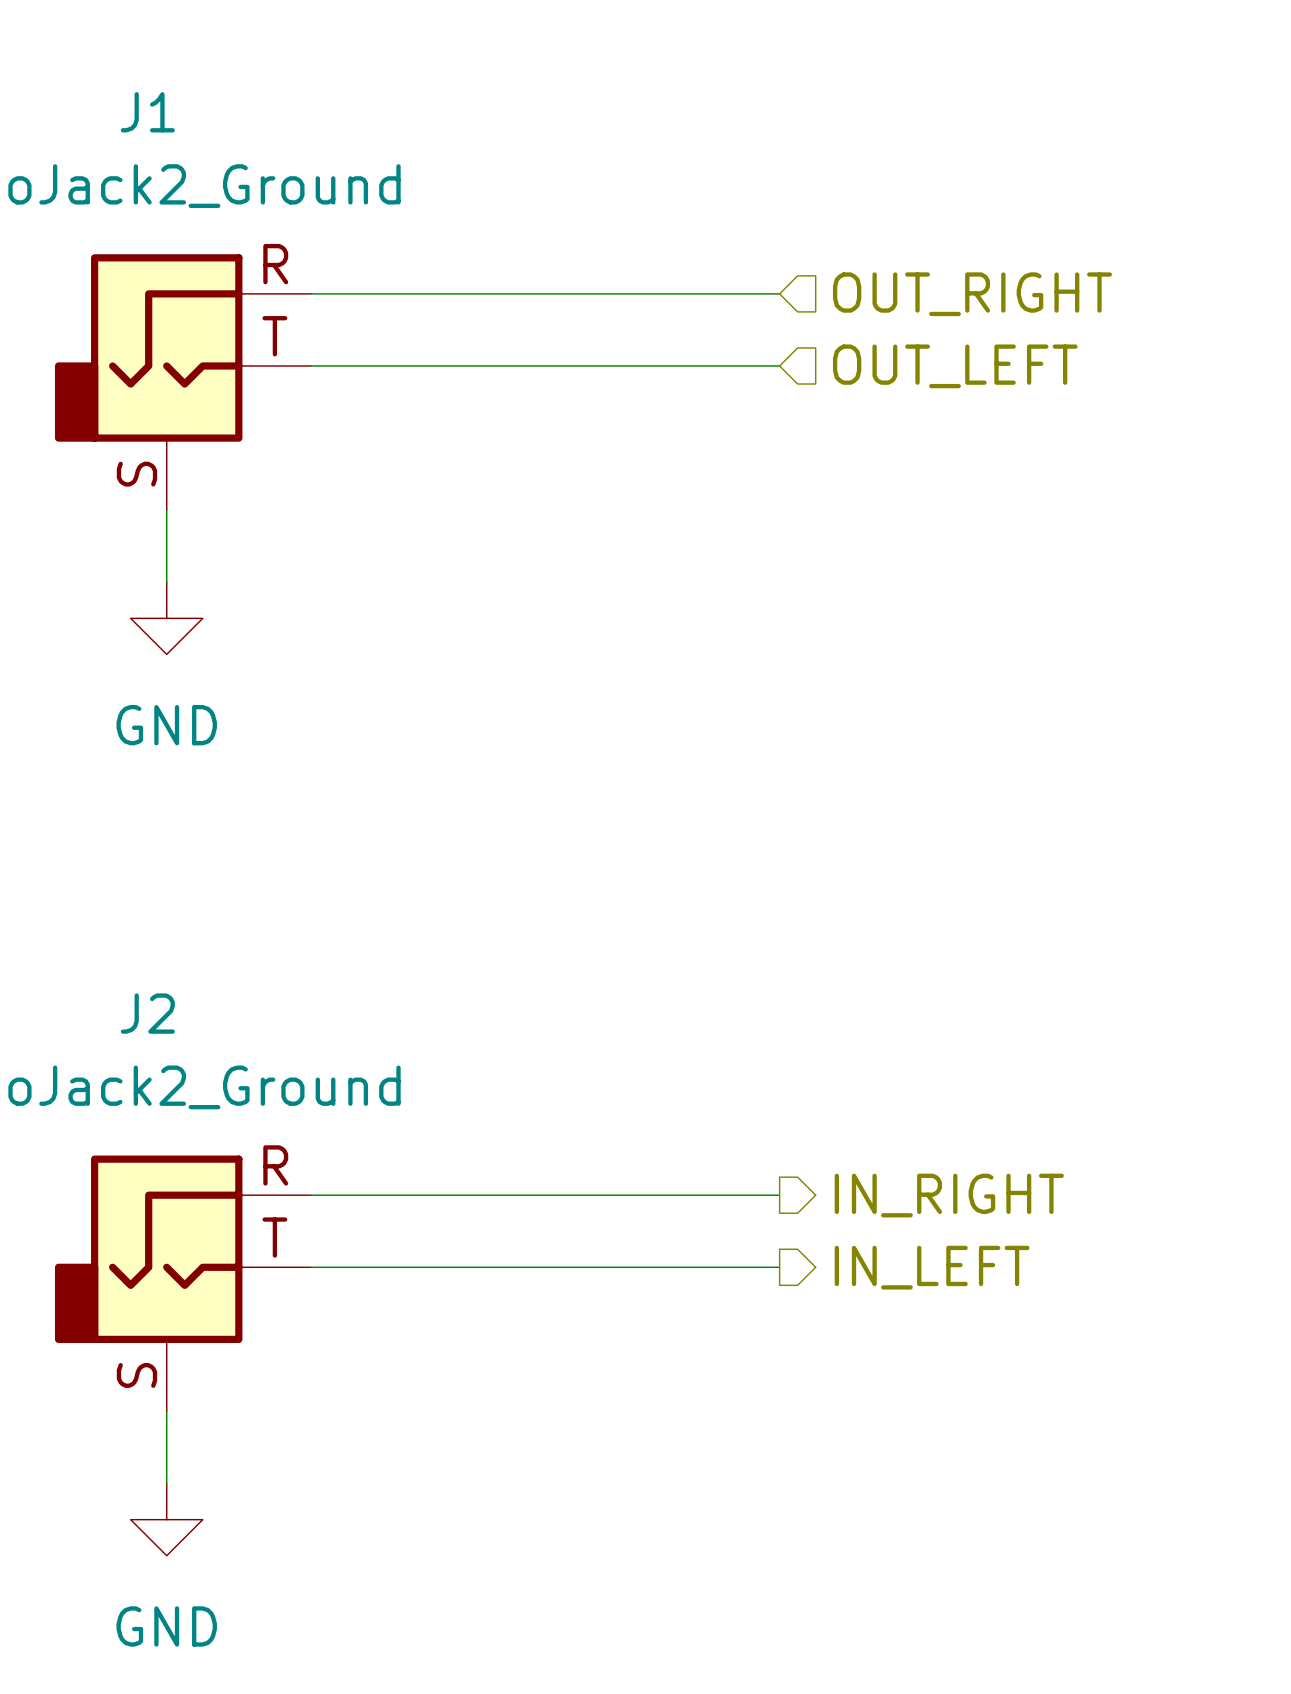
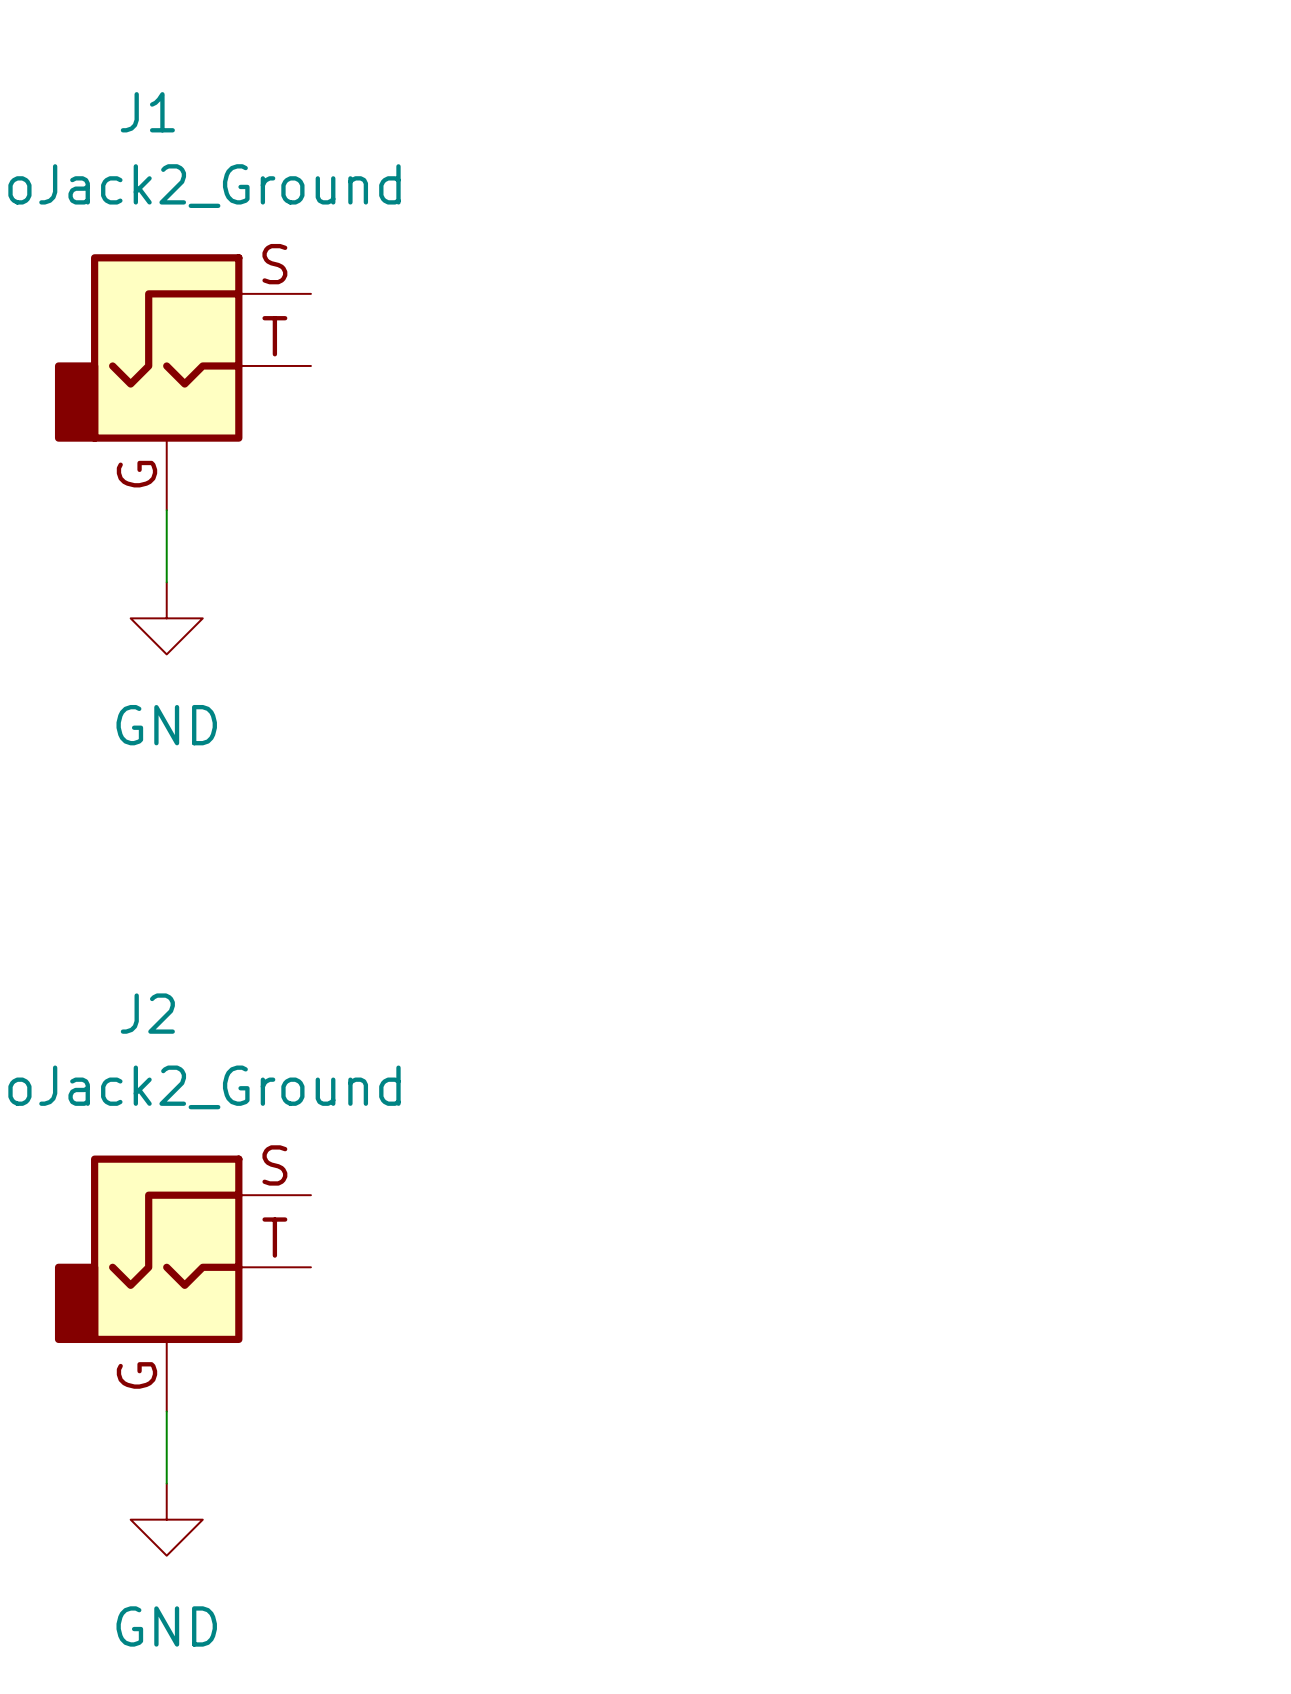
J1 pin number: R (275, 264) -> S (274, 264)
wire: (310, 293) (779, 293) -> none
hierarchical label: OUT_RIGHT (972, 294) -> none
wire: (310, 365) (779, 365) -> none
hierarchical label: OUT_LEFT (955, 366) -> none
J1 pin number: S (136, 474) -> G (136, 474)
J2 pin number: R (275, 1165) -> S (274, 1165)
wire: (310, 1195) (779, 1195) -> none
hierarchical label: IN_RIGHT (949, 1195) -> none
wire: (310, 1267) (779, 1267) -> none
hierarchical label: IN_LEFT (932, 1267) -> none
J2 pin number: S (136, 1375) -> G (136, 1375)

